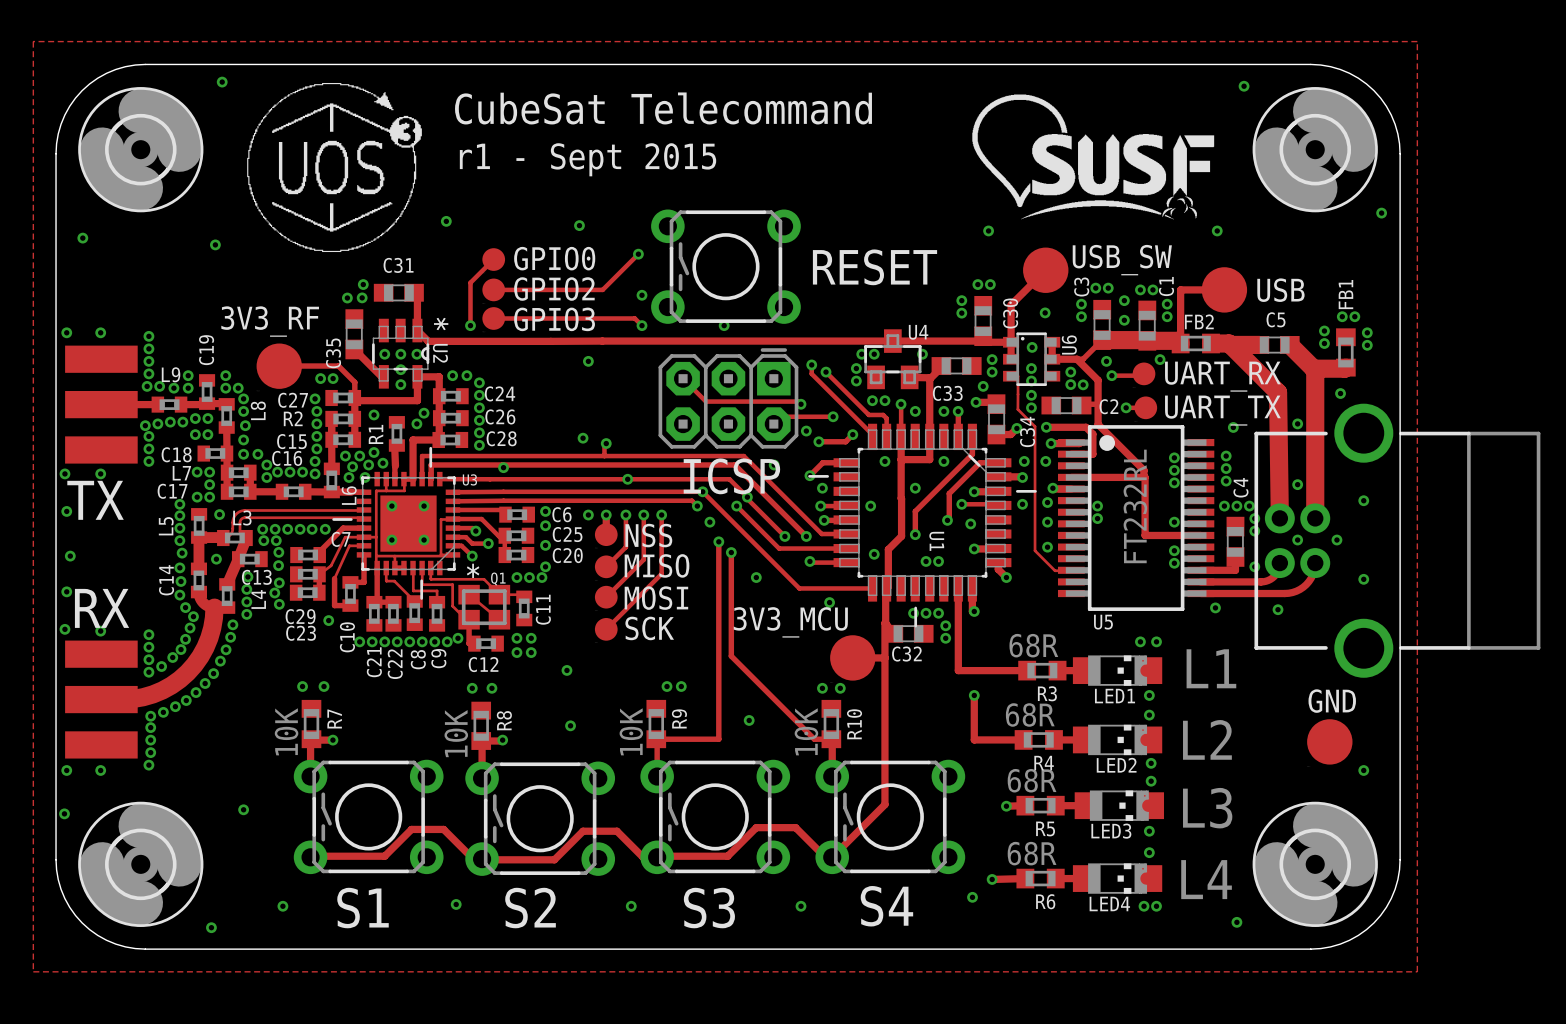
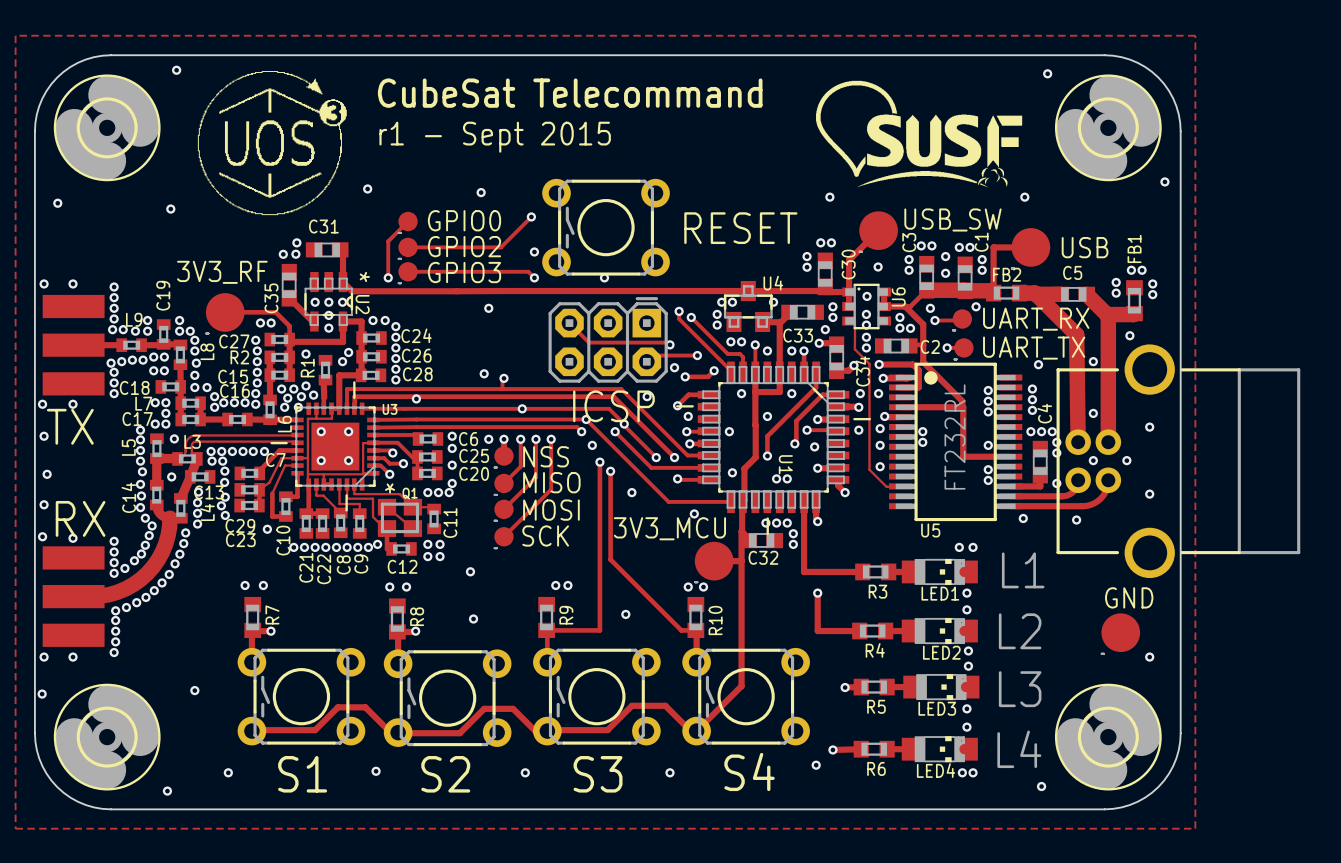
R3 value: 68R (1033, 645) -> none
R4 value: 68R (1030, 714) -> none
R7 value: 10K (286, 731) -> none
R9 value: 10K (631, 731) -> none
R10 value: 10K (806, 731) -> none
R8 value: 10K (456, 733) -> none
R5 value: 68R (1032, 780) -> none
R6 value: 68R (1032, 853) -> none

